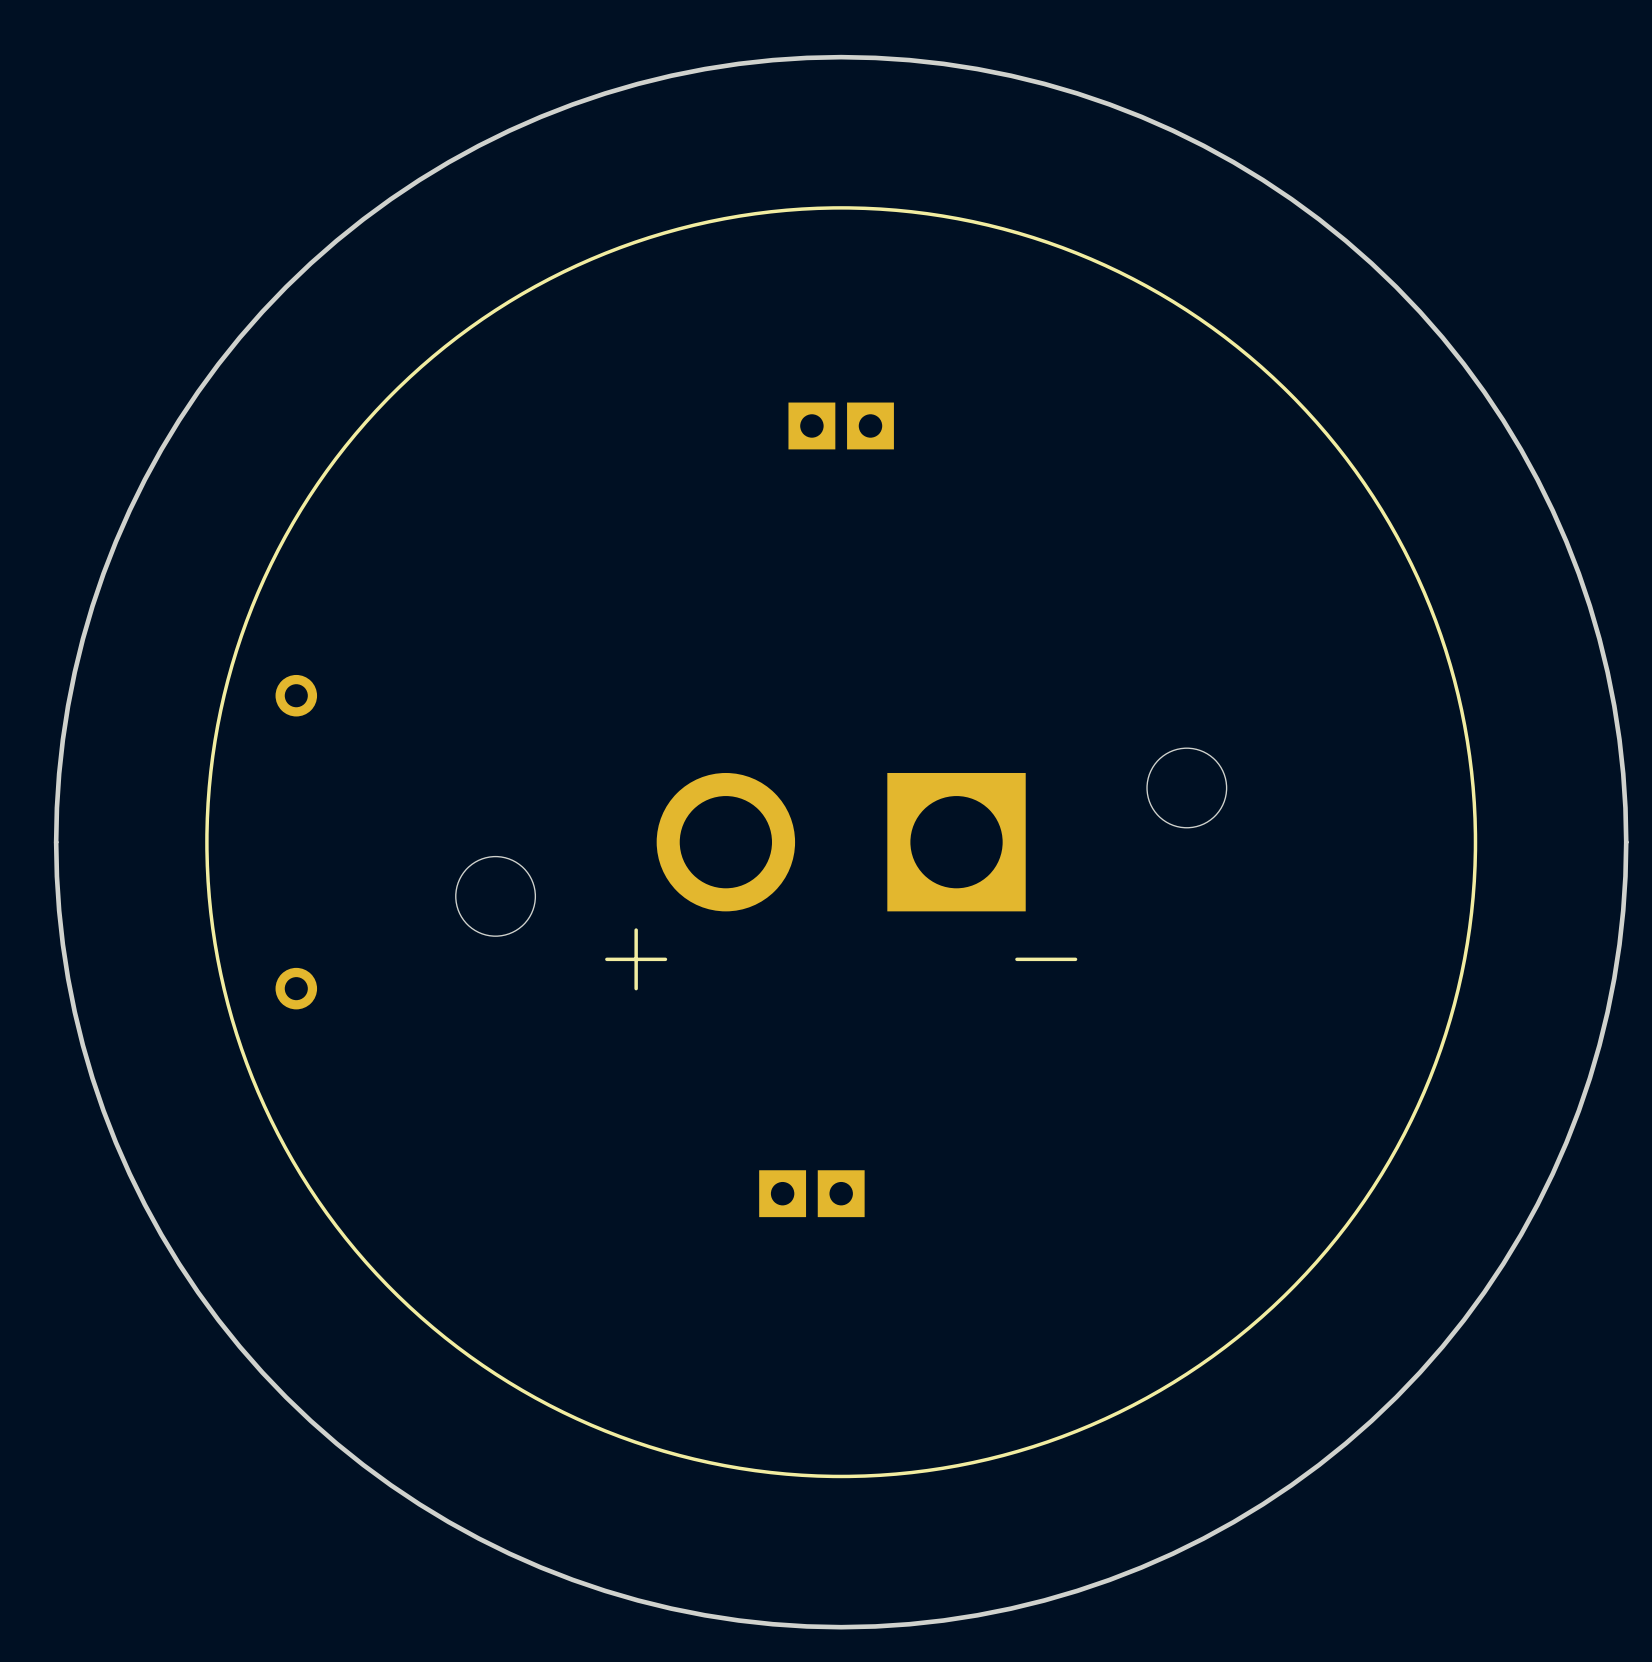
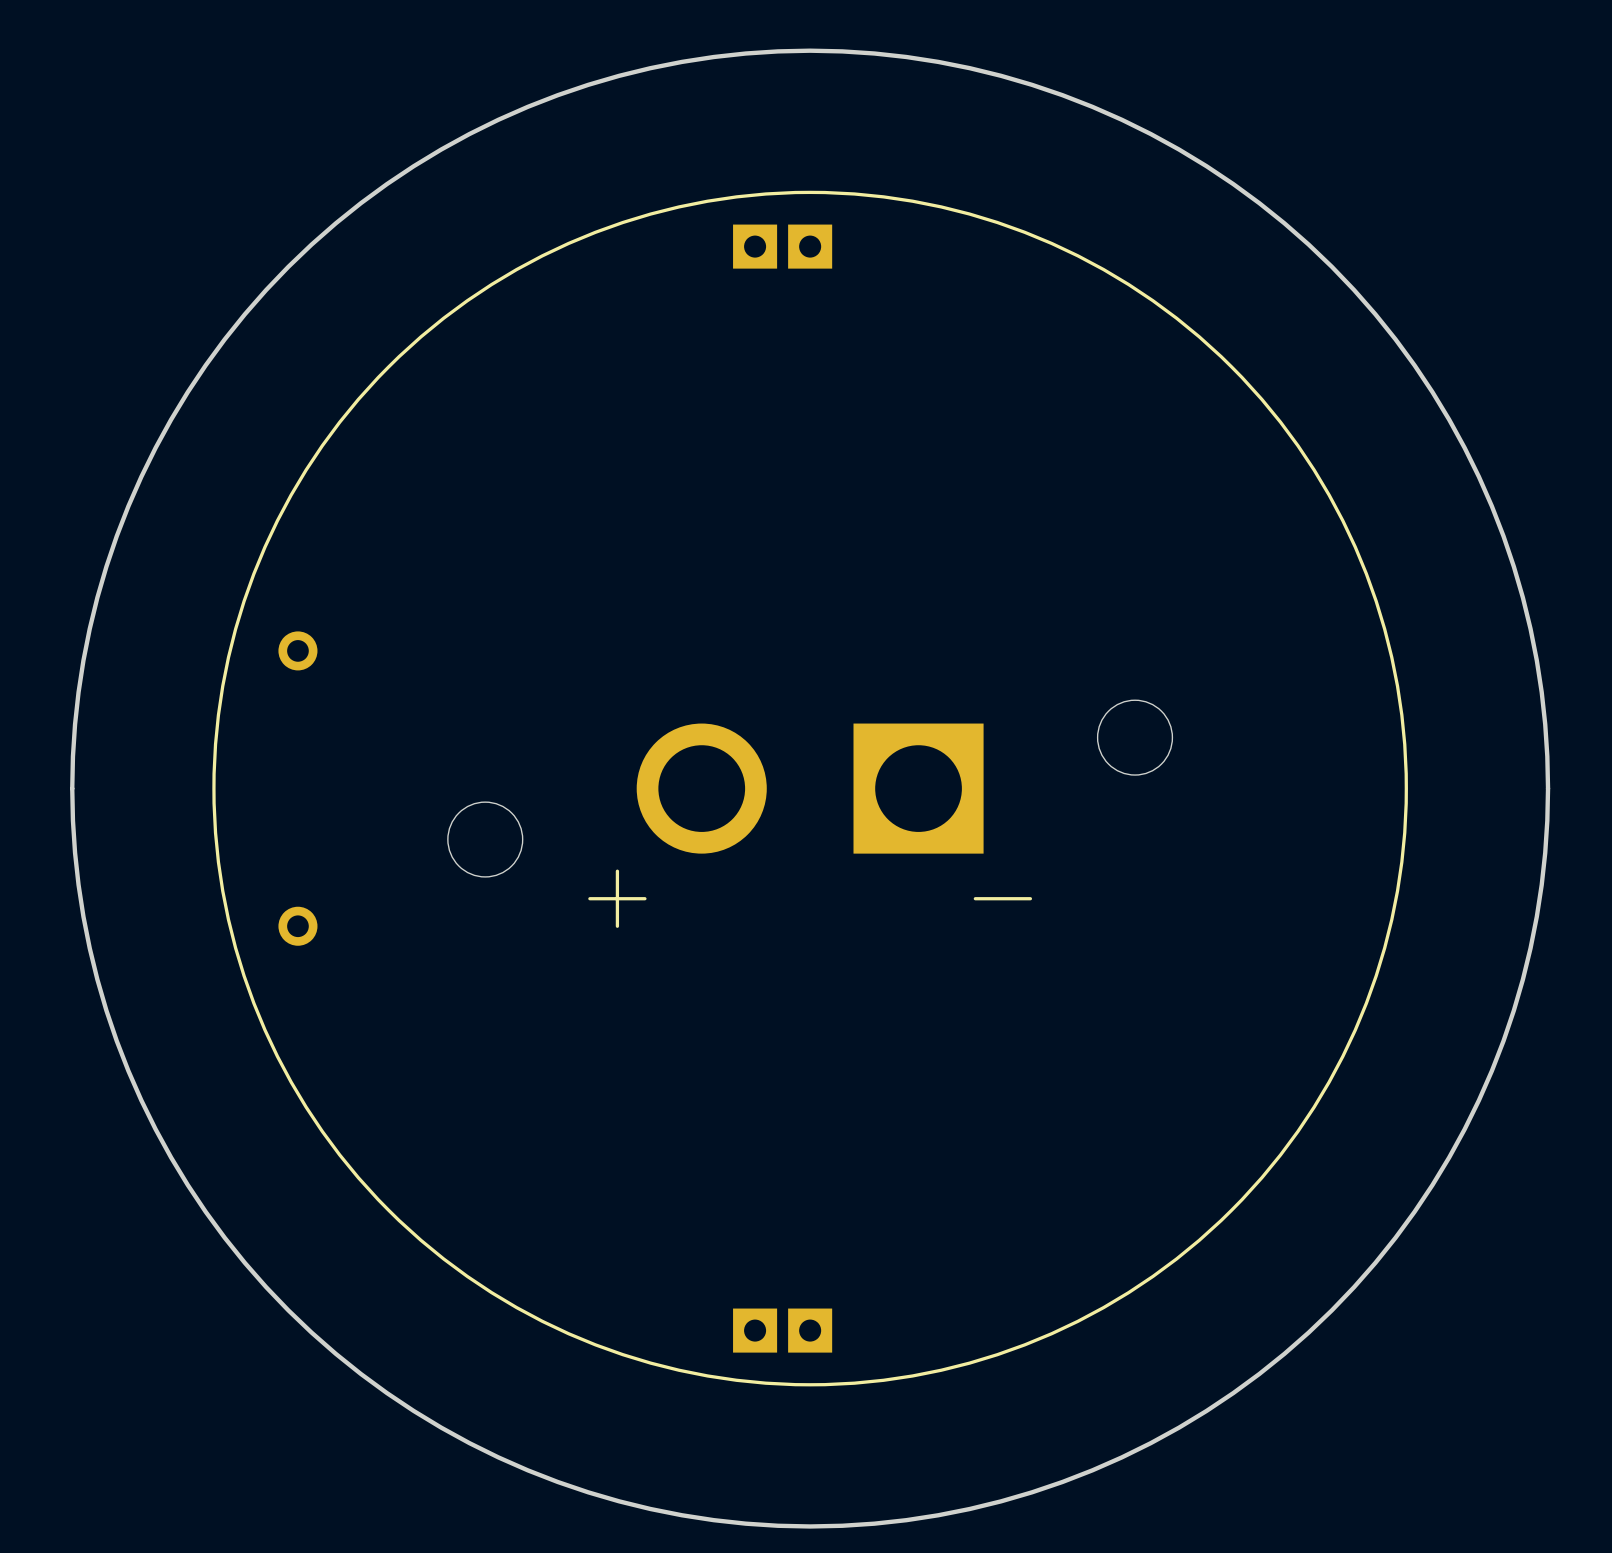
part position: (841, 425) -> (782, 246)
part position: (811, 1193) -> (782, 1330)

